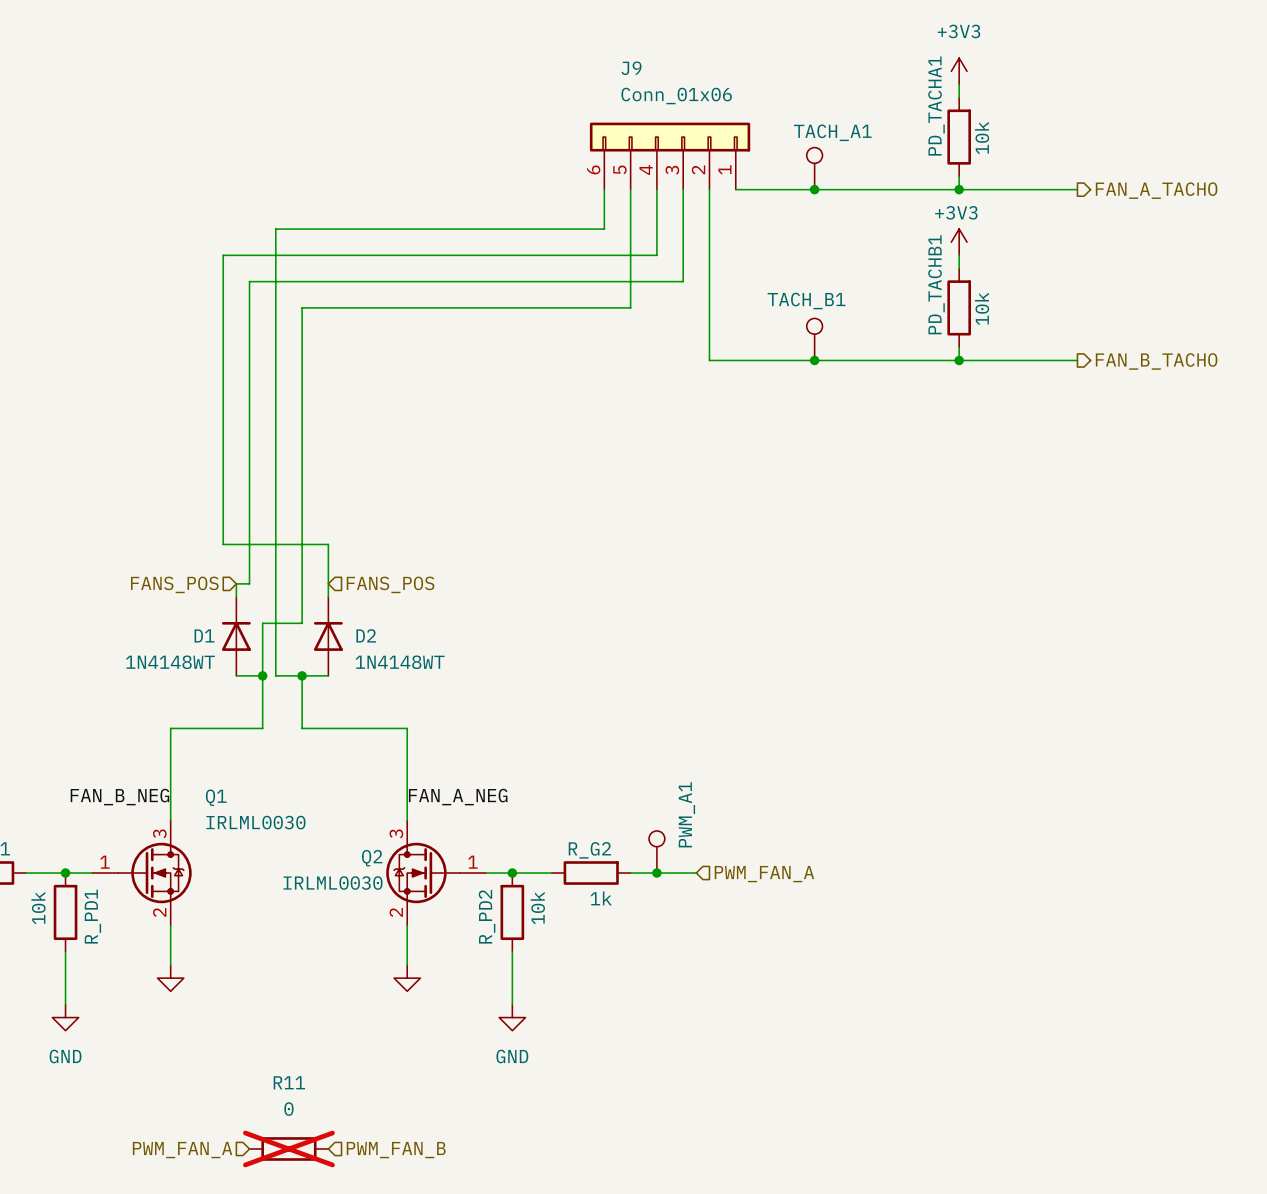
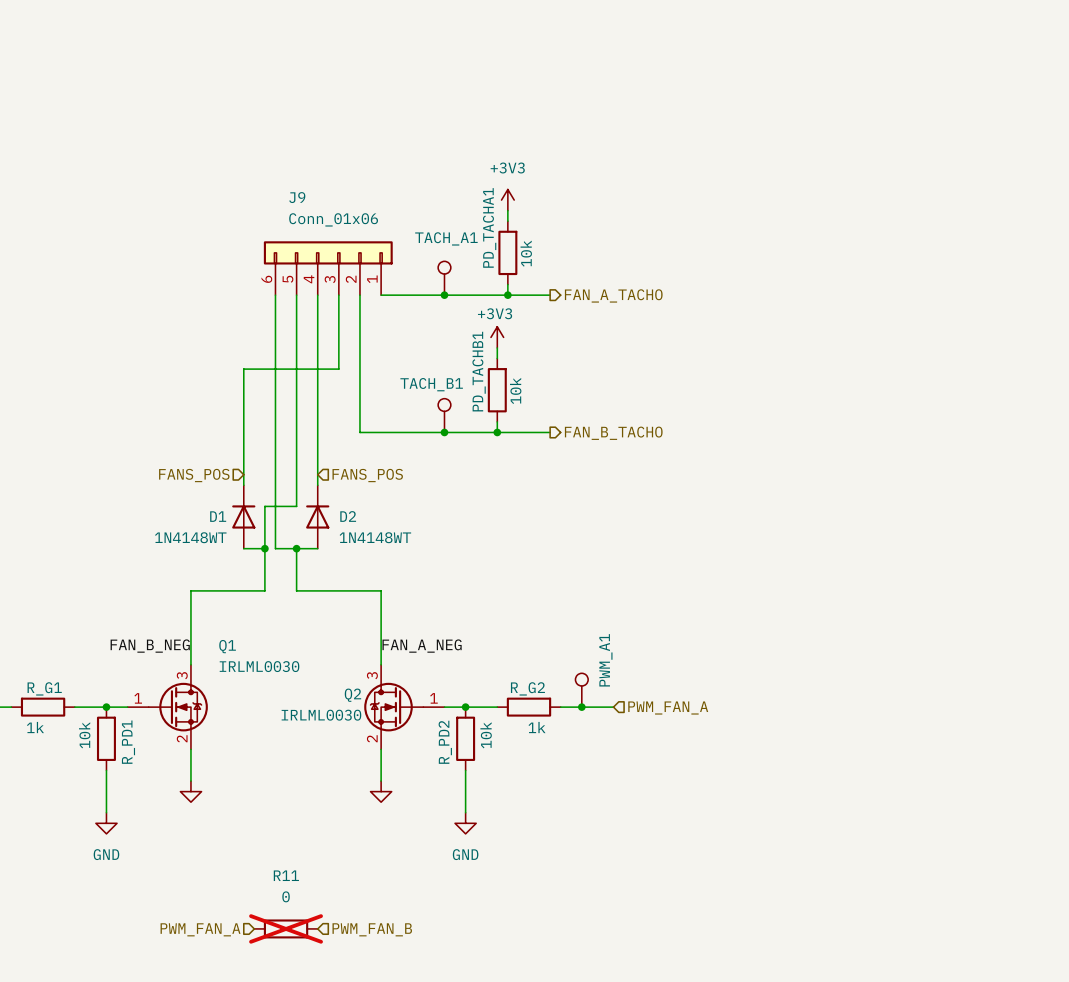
power symbol: +3V3 (959, 71) -> none
wire: (959, 84) (959, 97) -> none
TACH_A1 name position: TACH_A1 (832, 132) -> TACH_A1 (446, 238)
PD_TACHA1 position: (959, 137) -> (507, 252)
J9 position: (670, 156) -> (328, 268)
TACH_A1 position: (814, 168) -> (444, 278)
wire: (959, 176) (959, 189) -> none
wire: (604, 189) (604, 229) (275, 229) (275, 360) -> none
wire: (630, 189) (630, 307) (302, 307) (302, 360) -> none
wire: (656, 189) (656, 255) (223, 255) (223, 544) (328, 544) -> (317, 295) (317, 443)
wire: (683, 189) (683, 281) (249, 281) (249, 583) (236, 583) -> (338, 295) (338, 369) (243, 369) (243, 474)
wire: (709, 189) (709, 360) (1077, 360) -> none
wire: (735, 189) (1077, 189) -> none
junction: (814, 189) -> none
junction: (959, 189) -> none
hierarchical label: FAN_A_TACHO (1156, 190) -> none
power symbol: none -> +3V3 (507, 200)
power symbol: +3V3 (959, 242) -> none
wire: none -> (507, 210) (507, 221)
wire: (959, 255) (959, 268) -> none
TACH_B1 name position: TACH_B1 (806, 301) -> TACH_B1 (431, 384)
PD_TACHB1 position: (959, 307) -> (497, 390)
TACH_B1 position: (814, 339) -> (444, 415)
wire: none -> (507, 284) (507, 295)
wire: (959, 347) (959, 360) -> none
wire: none -> (359, 295) (359, 432) (550, 432)
wire: none -> (381, 295) (550, 295)
junction: none -> (444, 295)
junction: none -> (507, 295)
junction: (814, 360) -> none
junction: (959, 360) -> none
hierarchical label: none -> FAN_A_TACHO (613, 295)
hierarchical label: FAN_B_TACHO (1156, 361) -> none
power symbol: none -> +3V3 (497, 337)
wire: none -> (497, 347) (497, 358)
wire: none -> (497, 421) (497, 432)
junction: none -> (444, 432)
junction: none -> (497, 432)
hierarchical label: none -> FAN_B_TACHO (613, 433)

